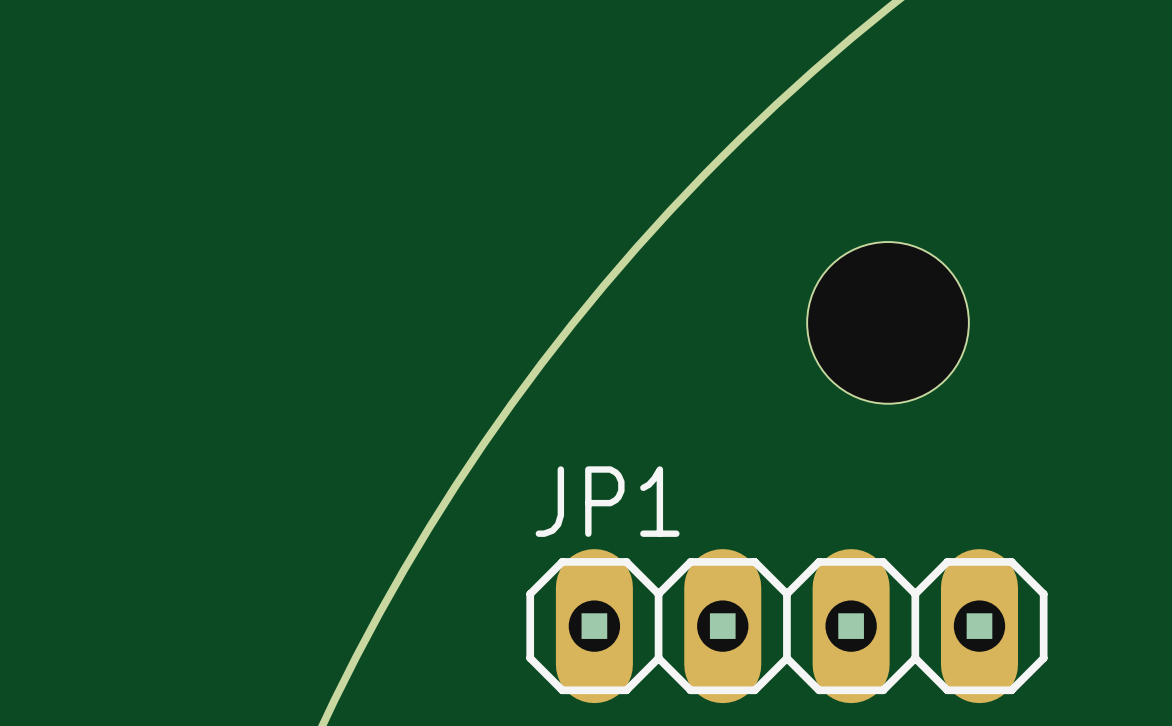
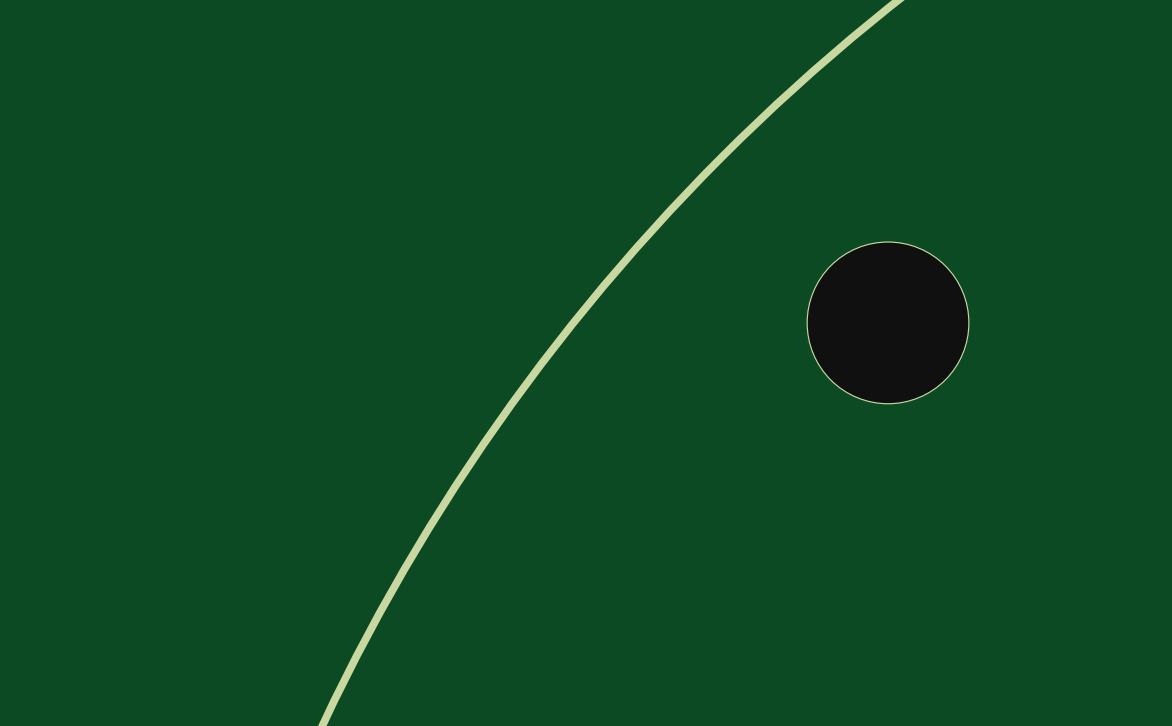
JP1: (786, 626) -> none

